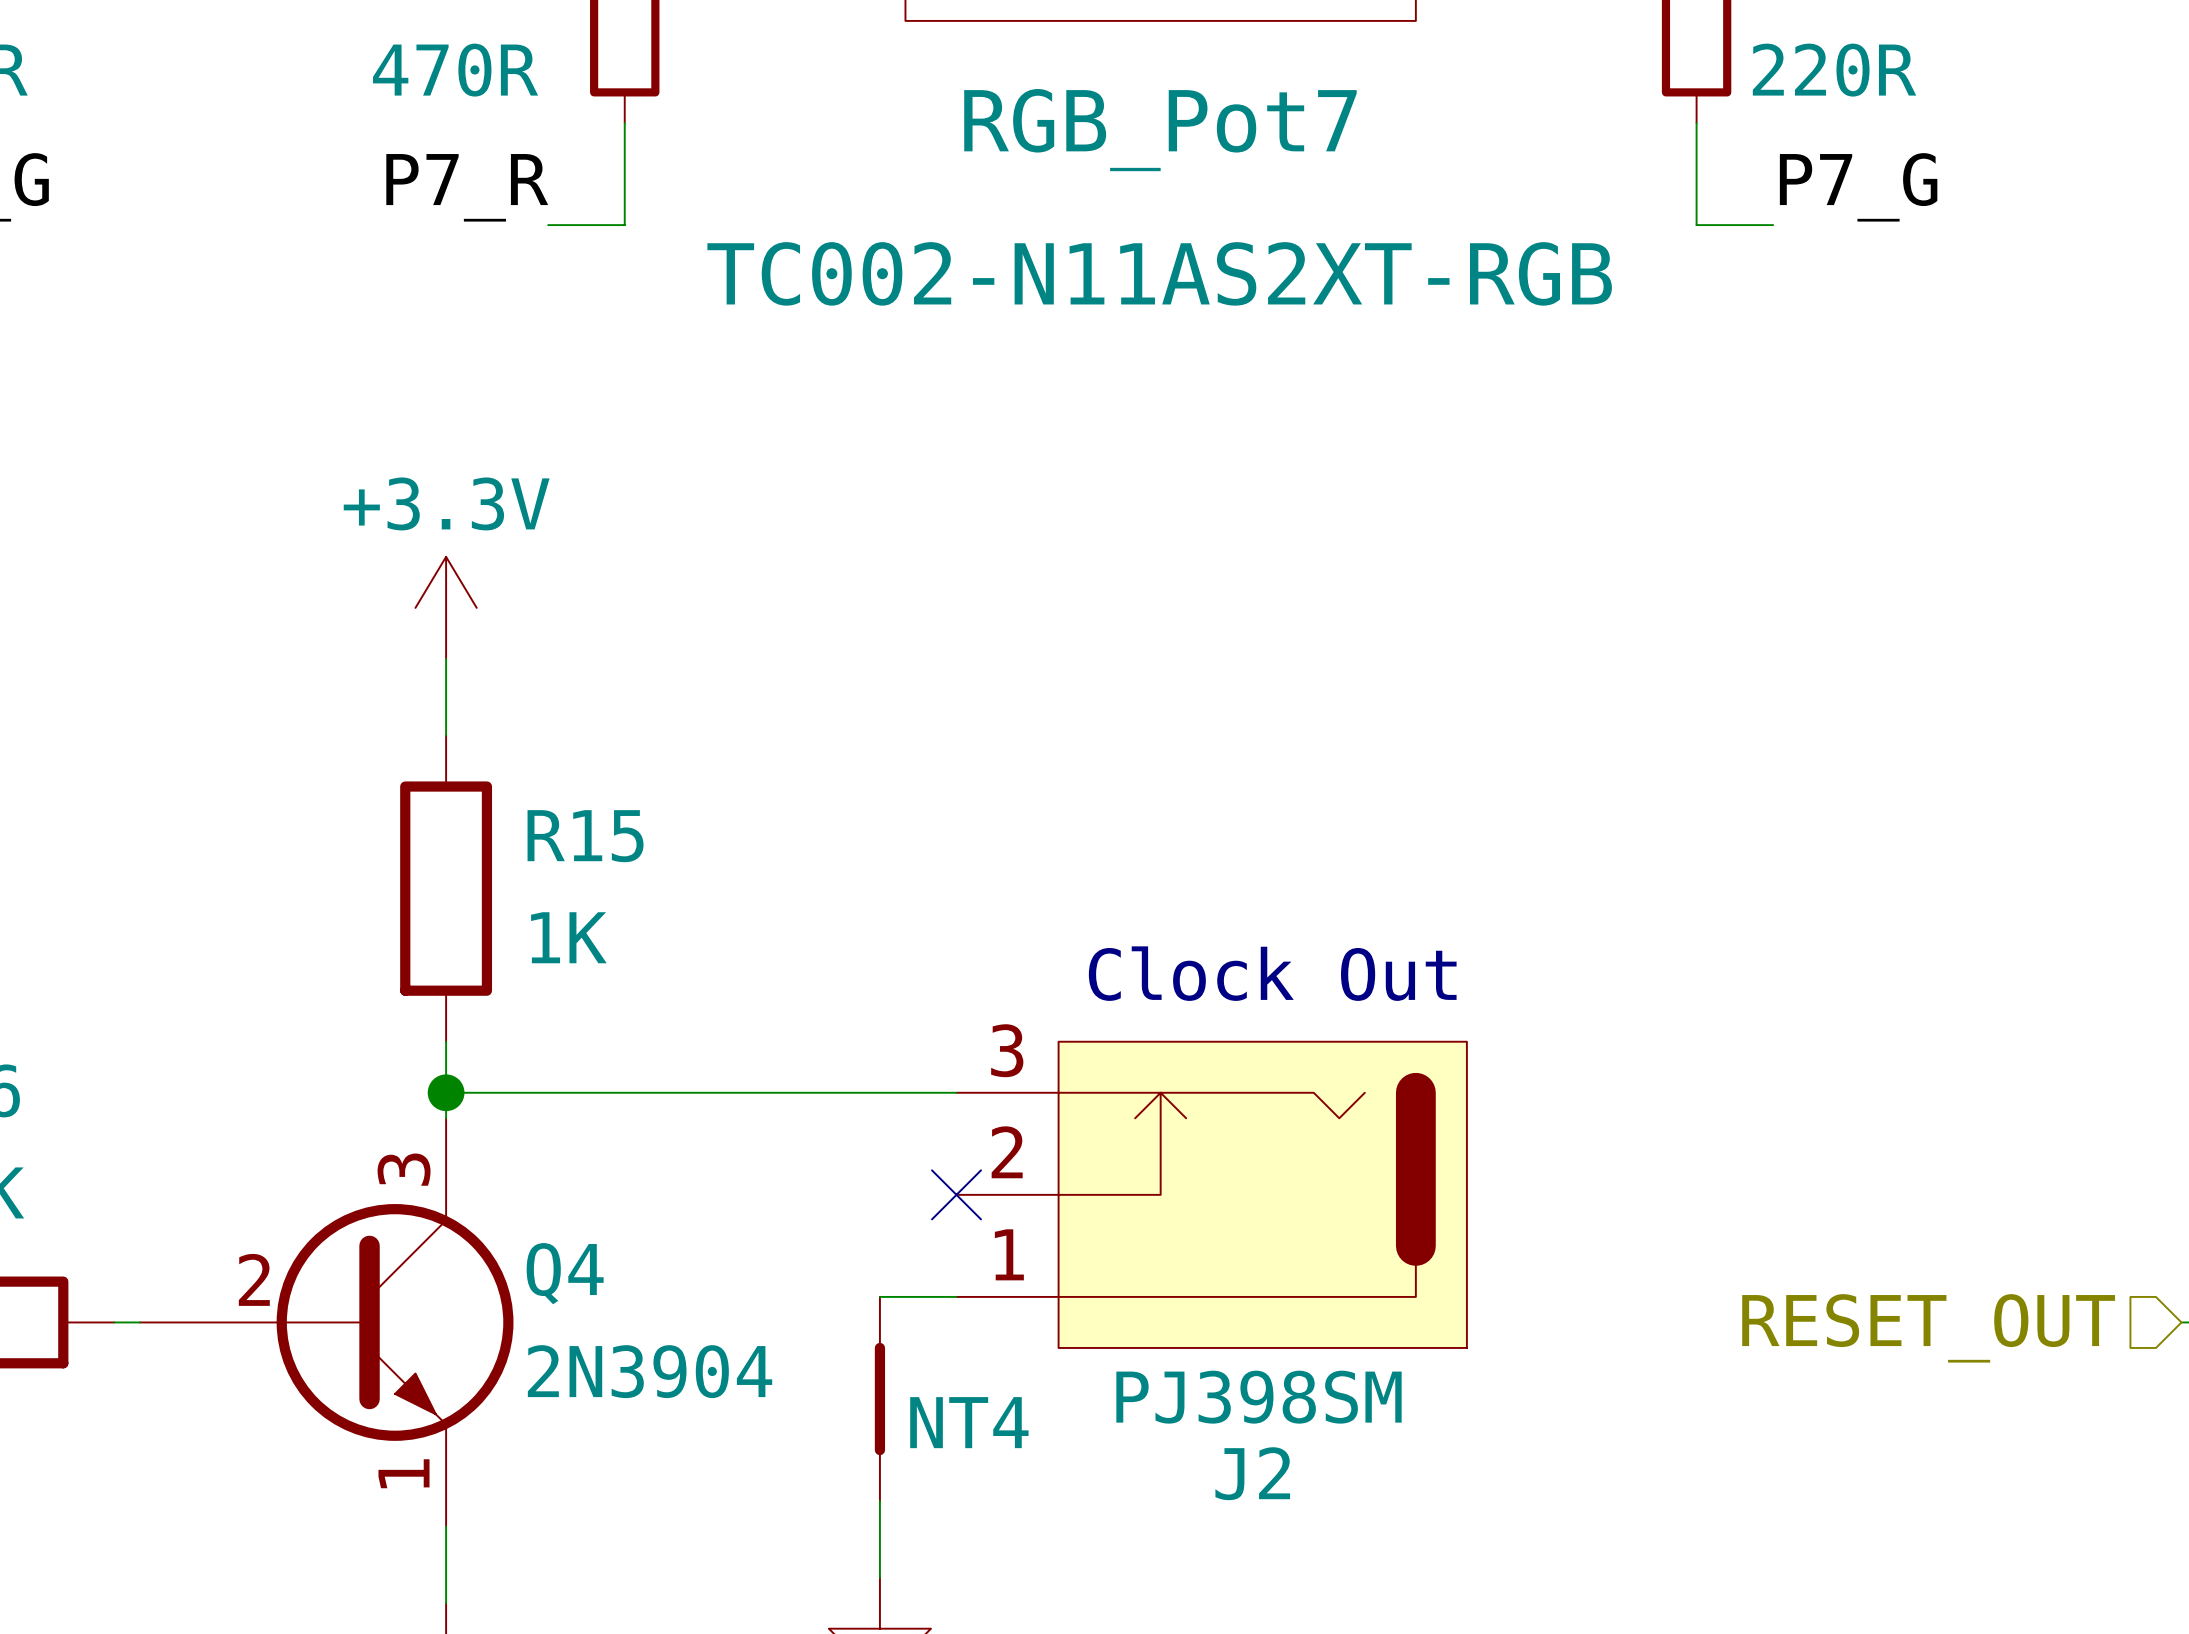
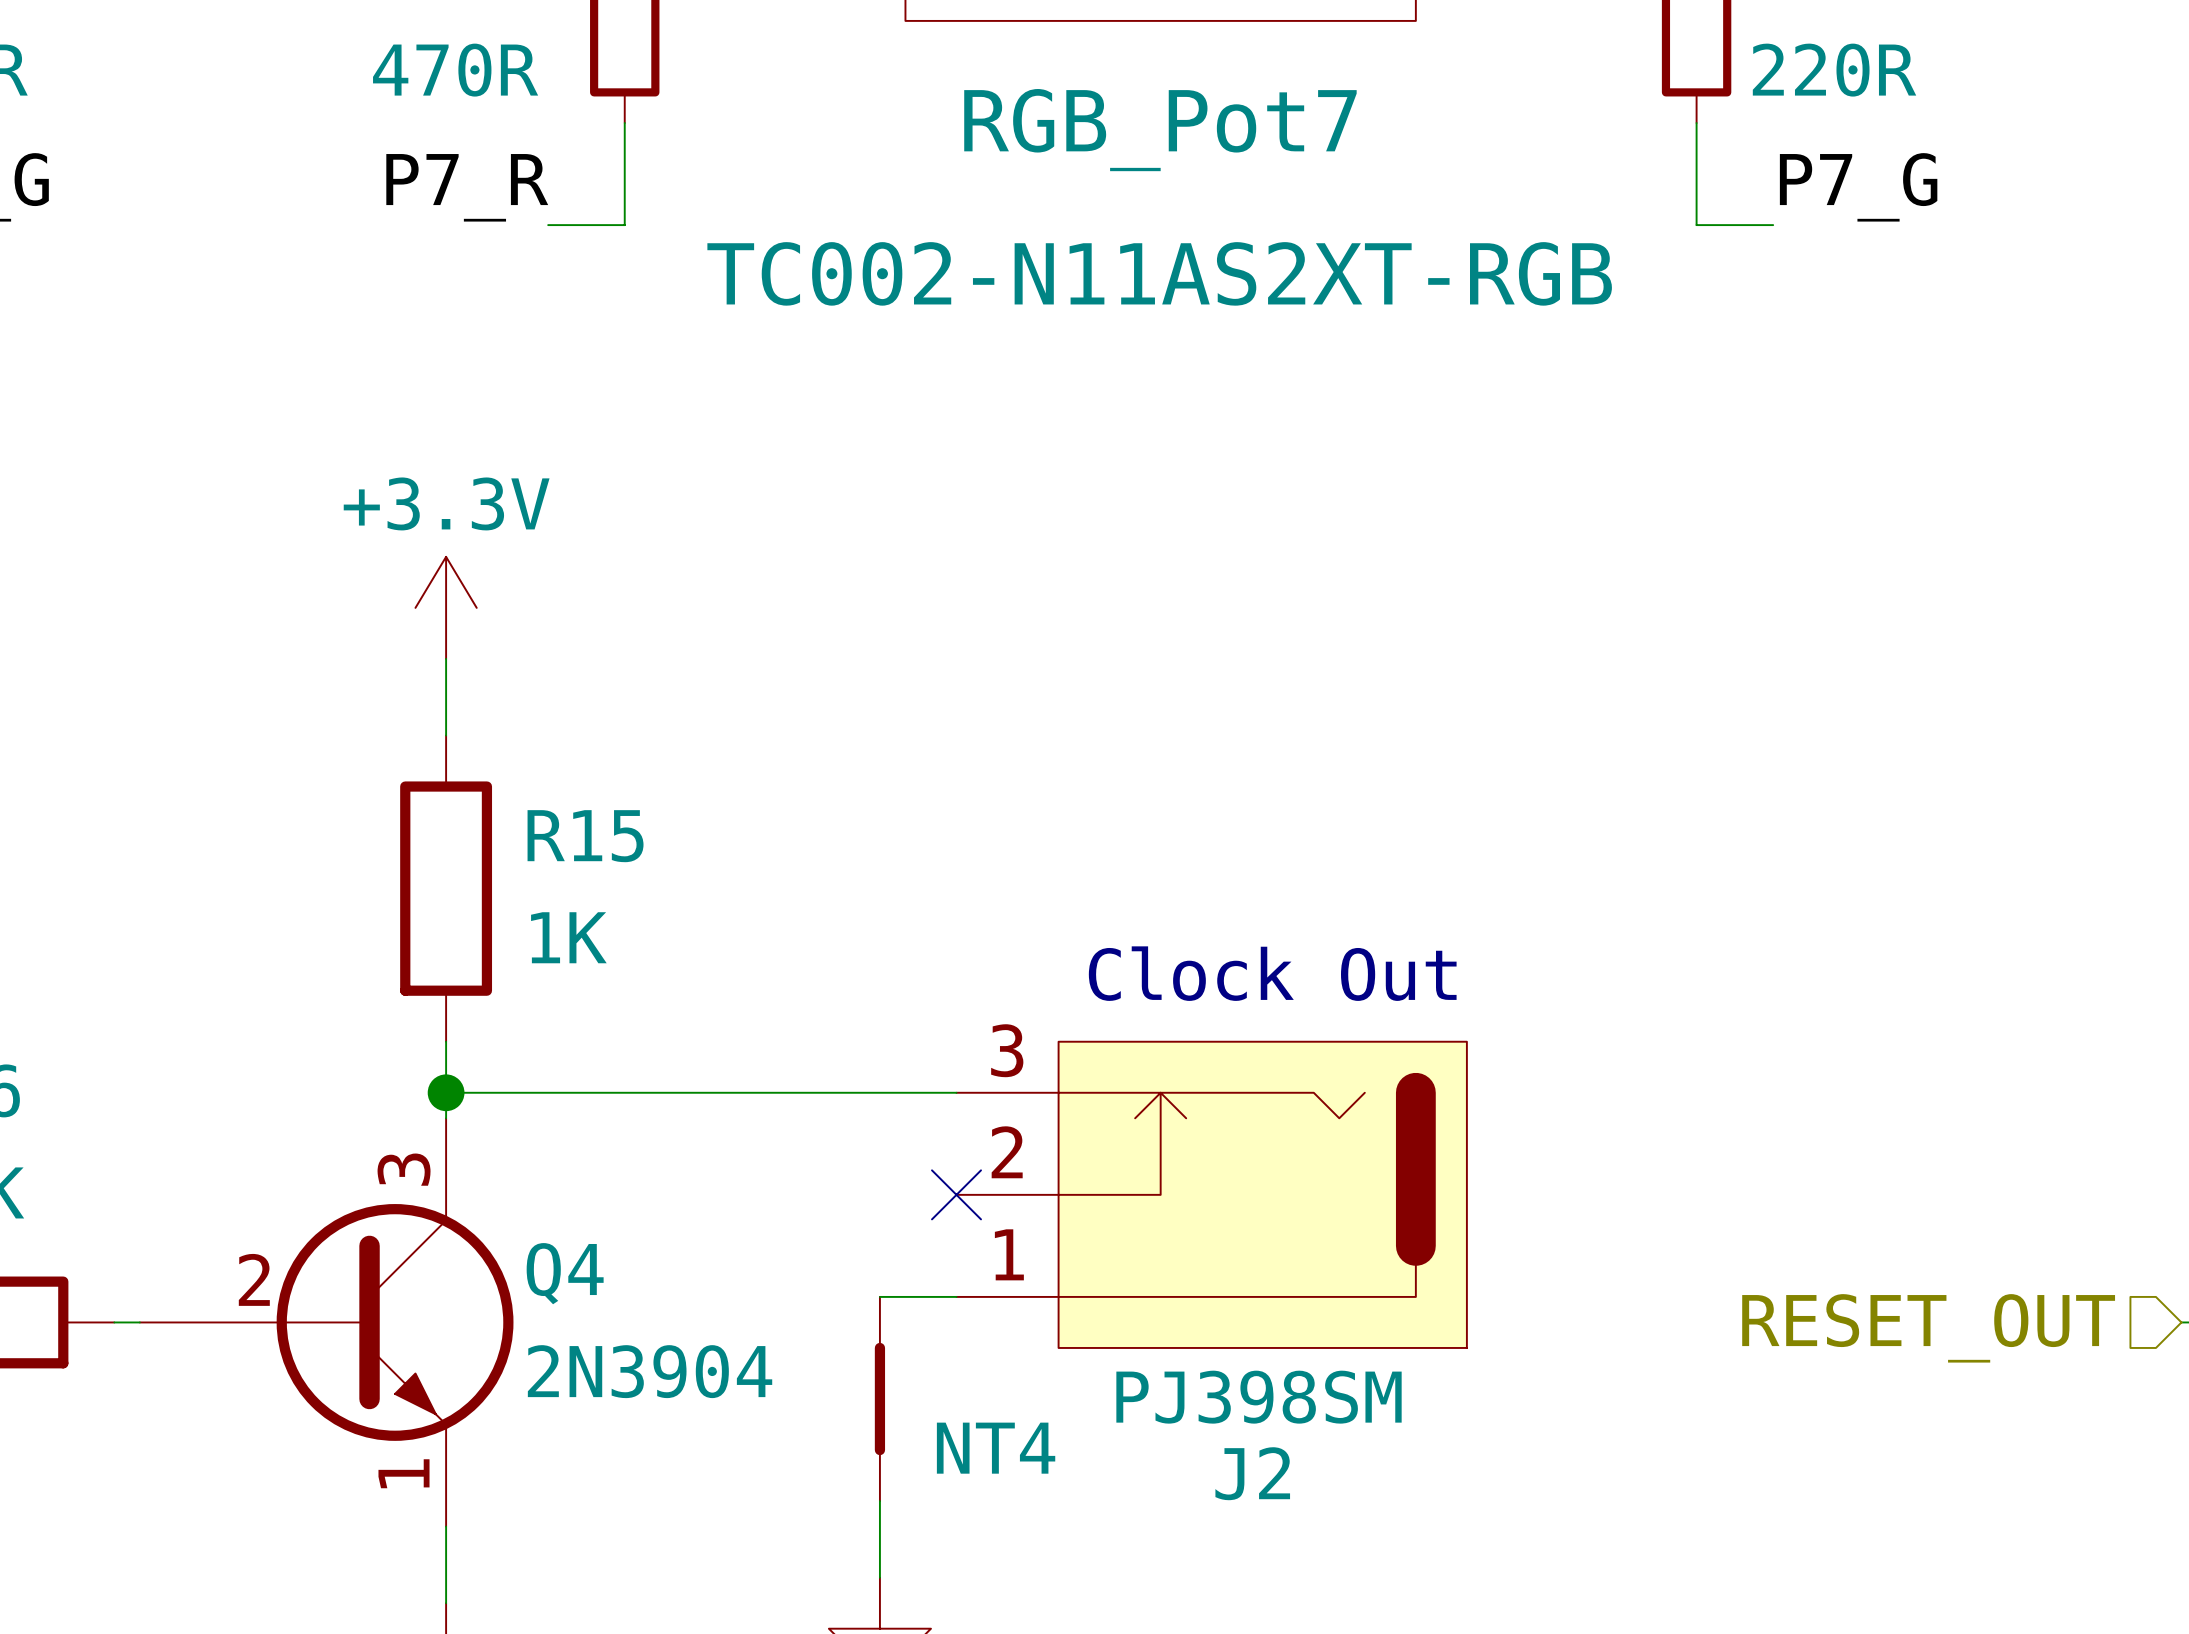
NT4 name position: NT4 (969, 1422) -> NT4 (996, 1448)

